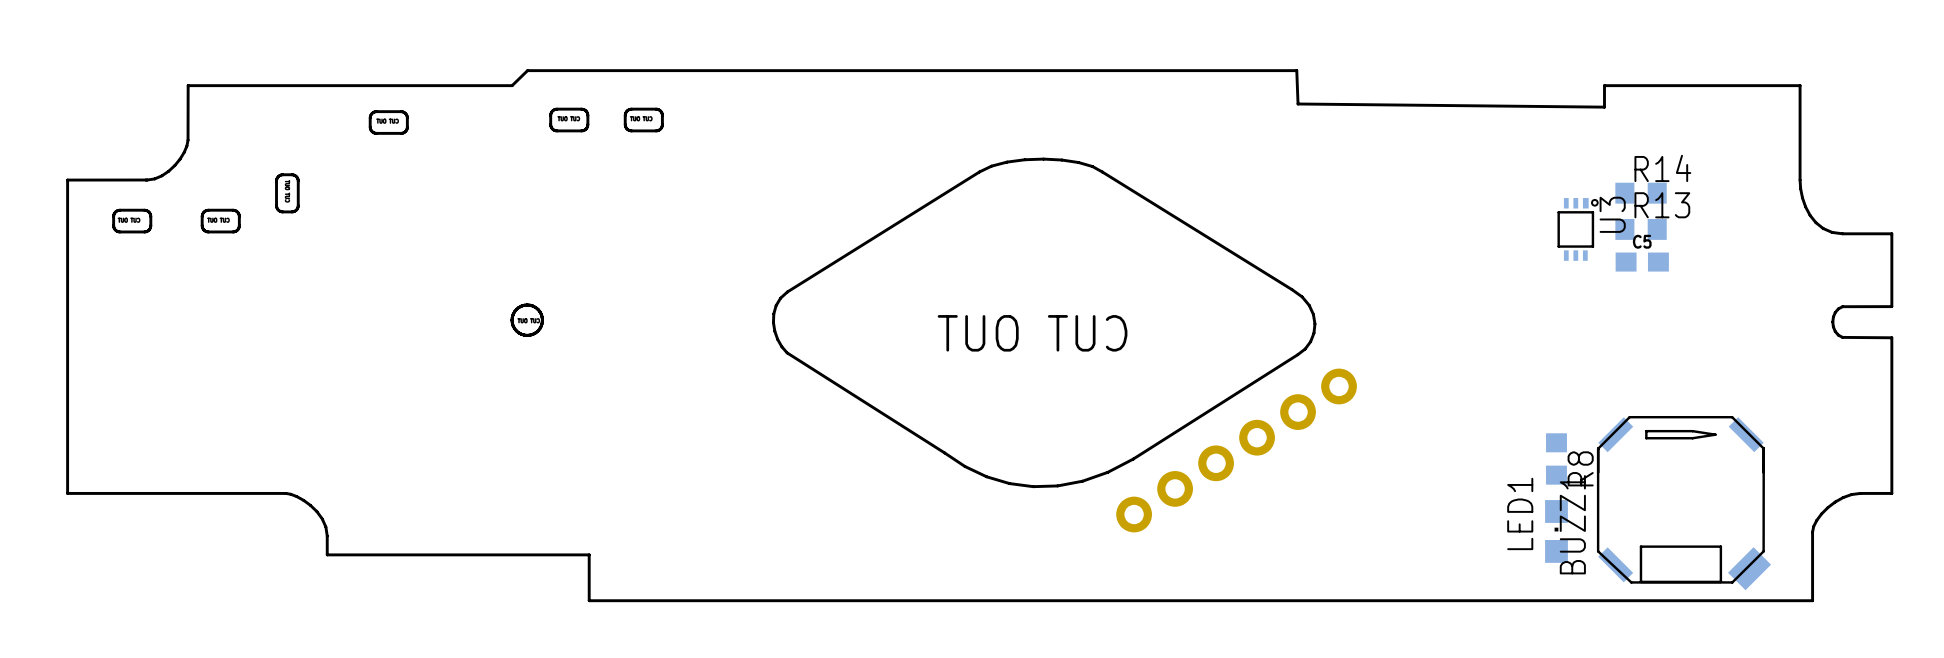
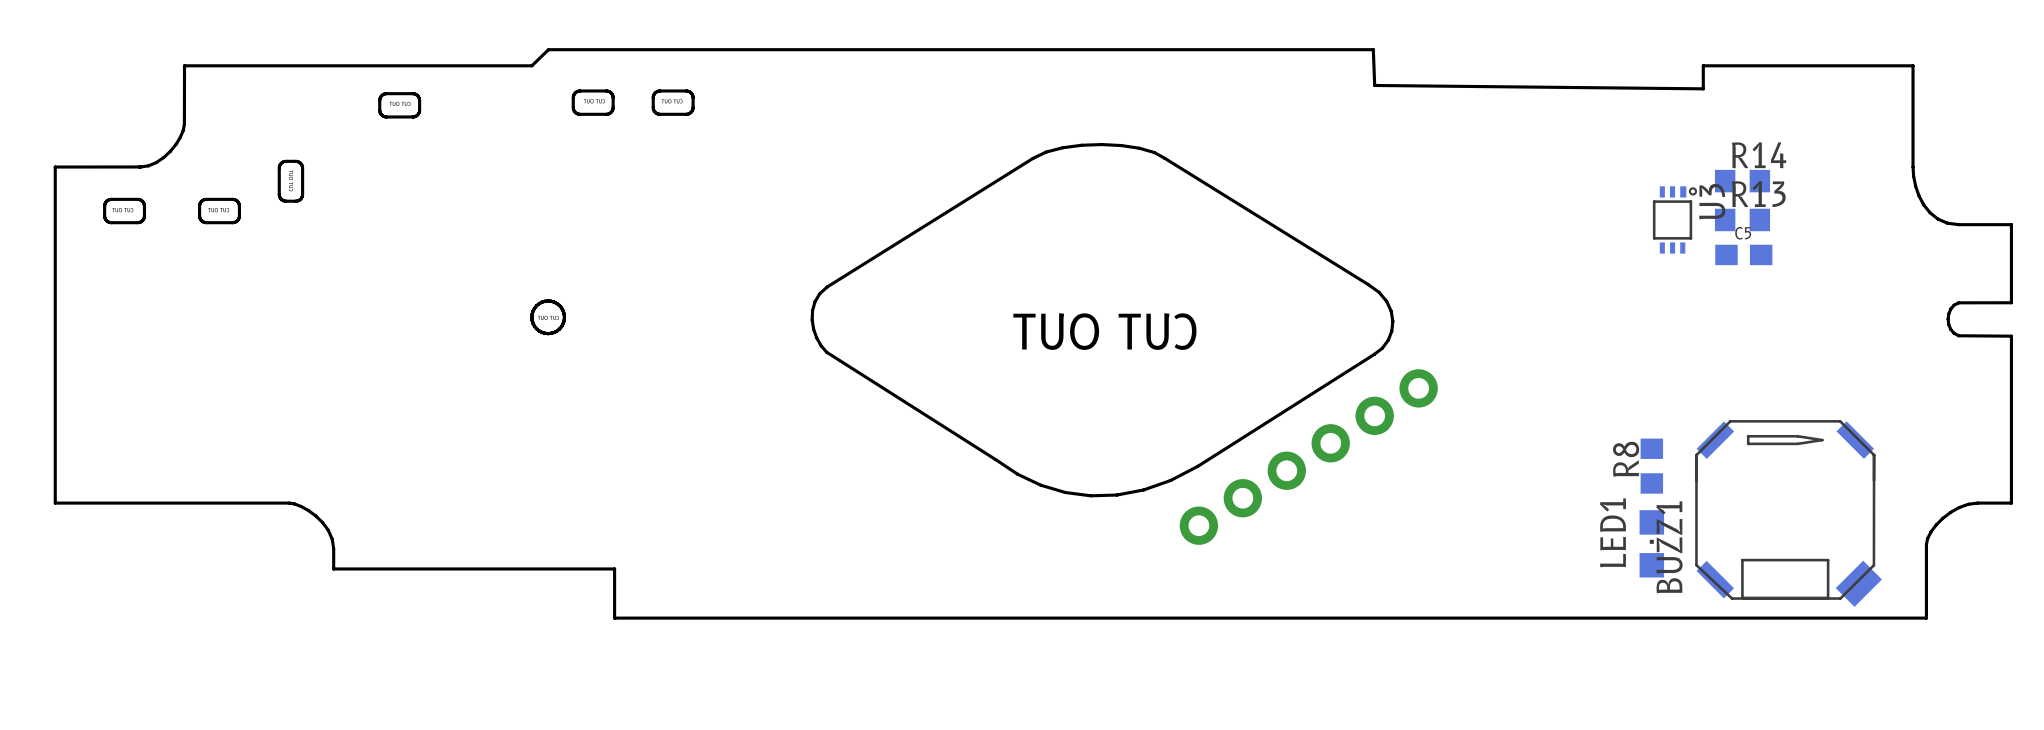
R8 name position: R8 (1580, 468) -> R8 (1626, 459)

